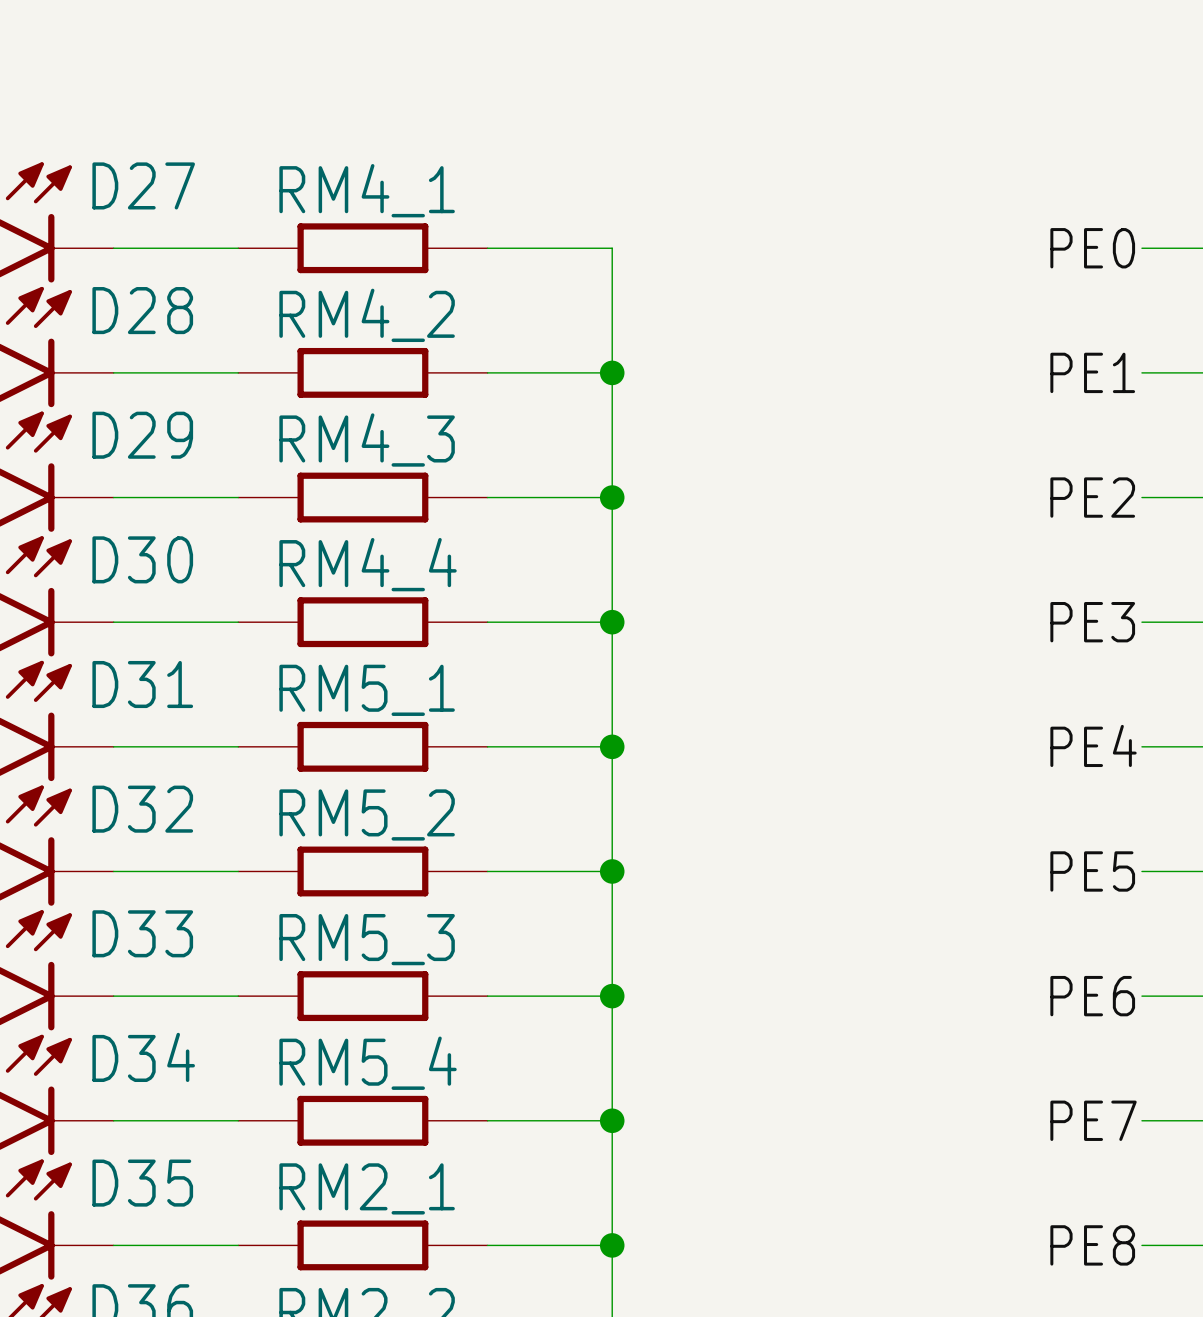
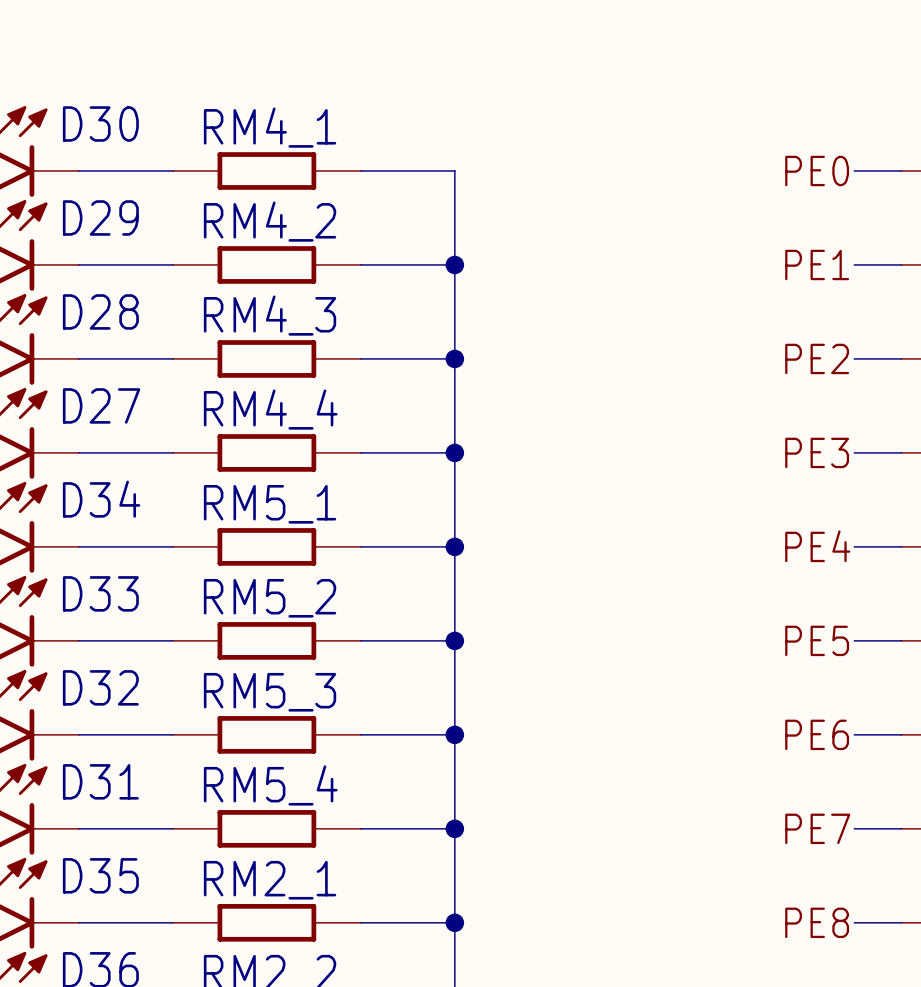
D27 name: D27 (143, 185) -> D30 (100, 124)
D28 name: D28 (142, 310) -> D29 (100, 217)
D29 name: D29 (142, 435) -> D28 (100, 311)
D30 name: D30 (142, 559) -> D27 (101, 405)
D31 name: D31 (142, 684) -> D34 (101, 499)
D32 name: D32 (142, 809) -> D33 (100, 593)
D33 name: D33 (142, 933) -> D32 (100, 687)
D34 name: D34 (143, 1057) -> D31 (100, 781)

